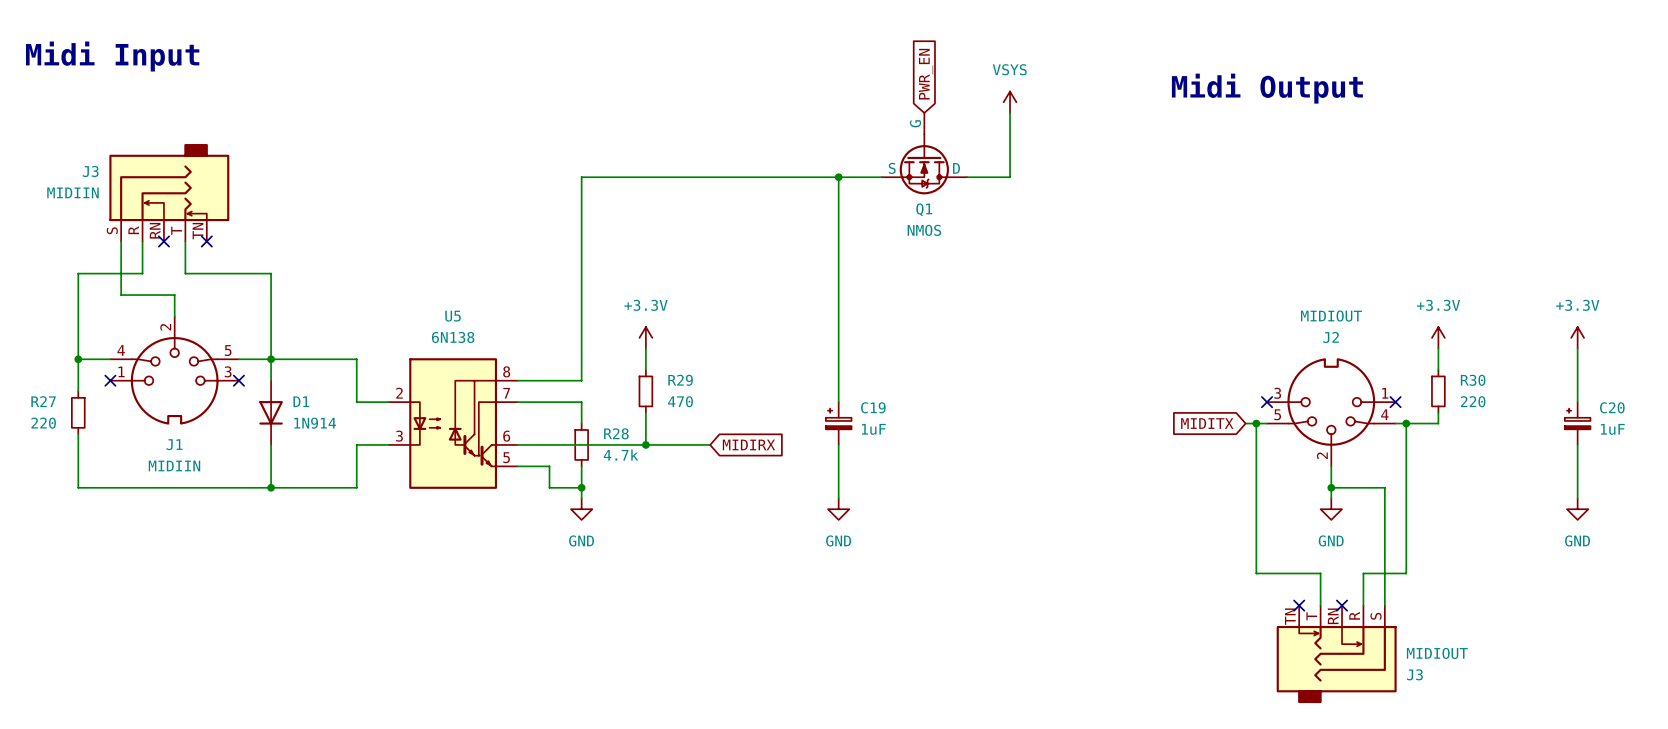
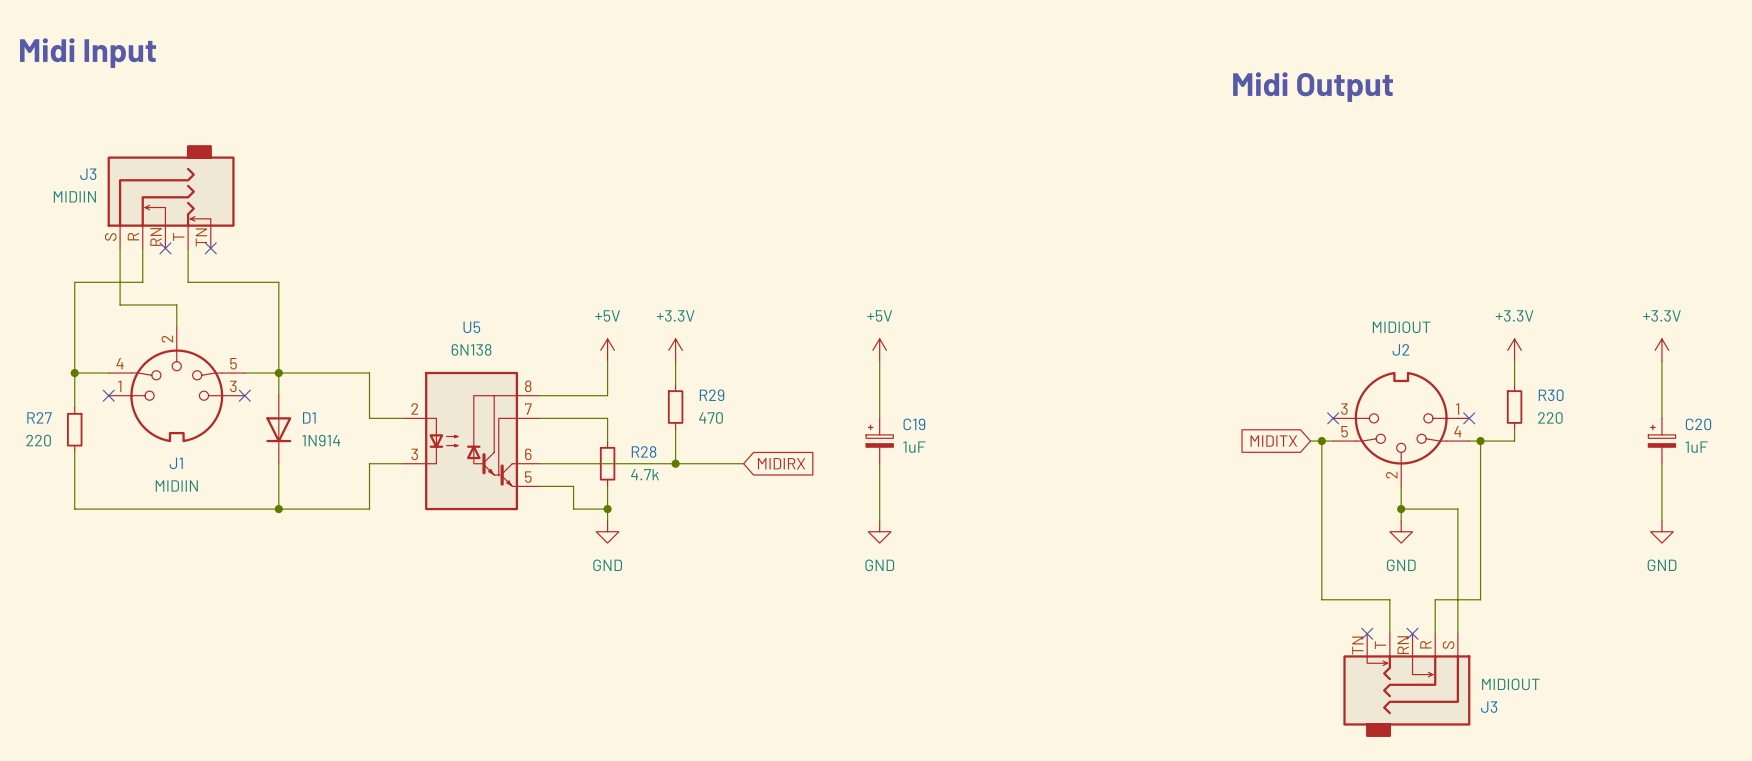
global label: PWR_EN (926, 74) -> none
power symbol: VSYS (1010, 102) -> none
wire: (1010, 112) (1010, 177) (967, 177) -> none
Q1: NMOS (924, 153) -> none
wire: (838, 177) (838, 348) -> none
junction: (838, 177) -> none
wire: (881, 177) (581, 177) (581, 348) -> none
power symbol: none -> +5V (607, 350)
power symbol: none -> +5V (879, 350)

